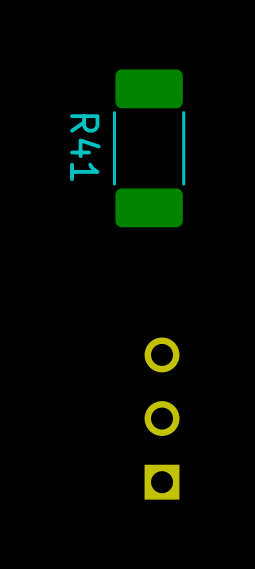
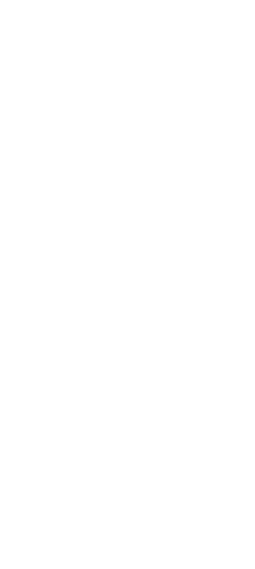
R41: (149, 148) -> none
part: (162, 418) -> none

